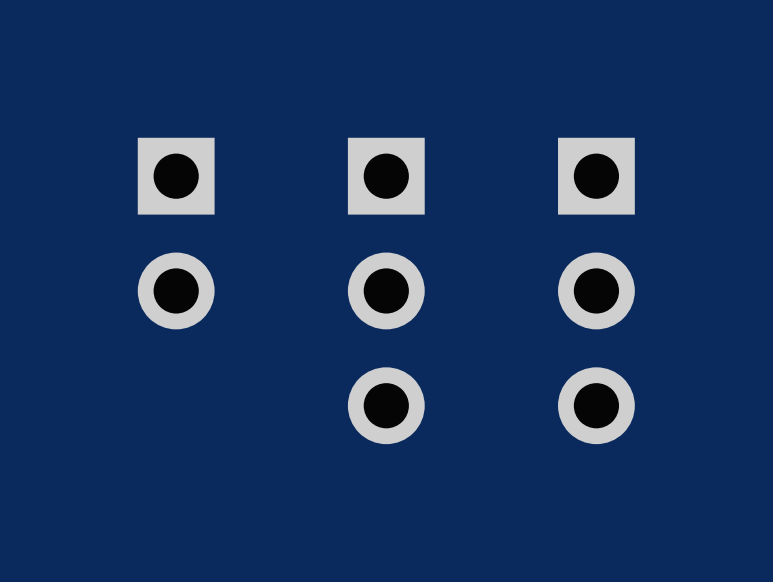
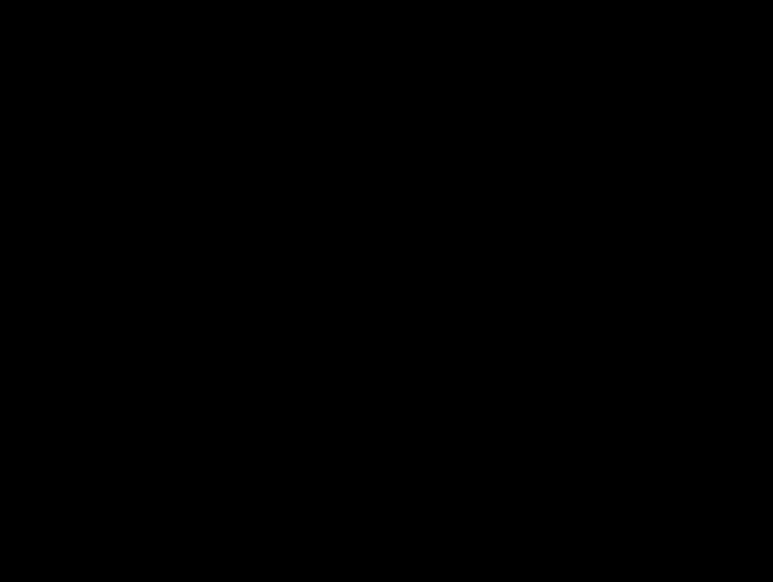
part: (176, 233) -> none
part: (386, 290) -> none
part: (596, 290) -> none

